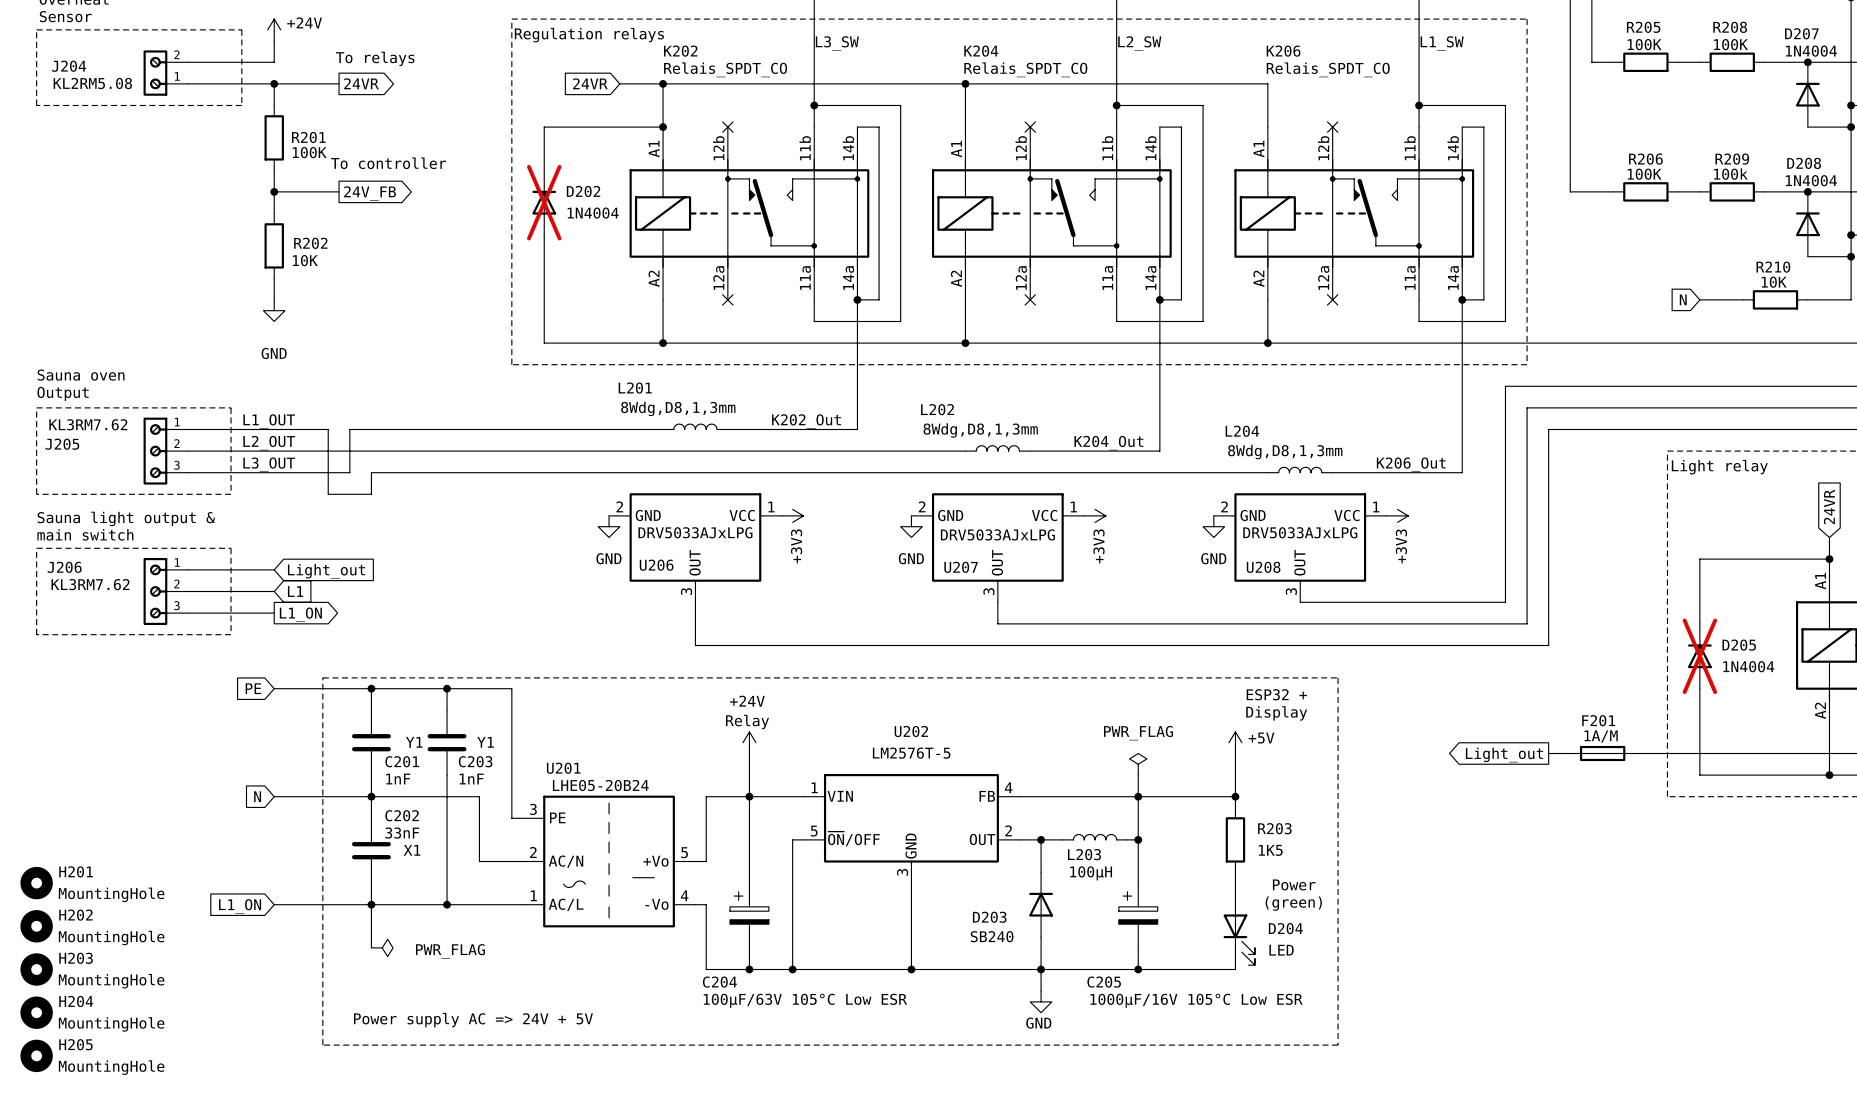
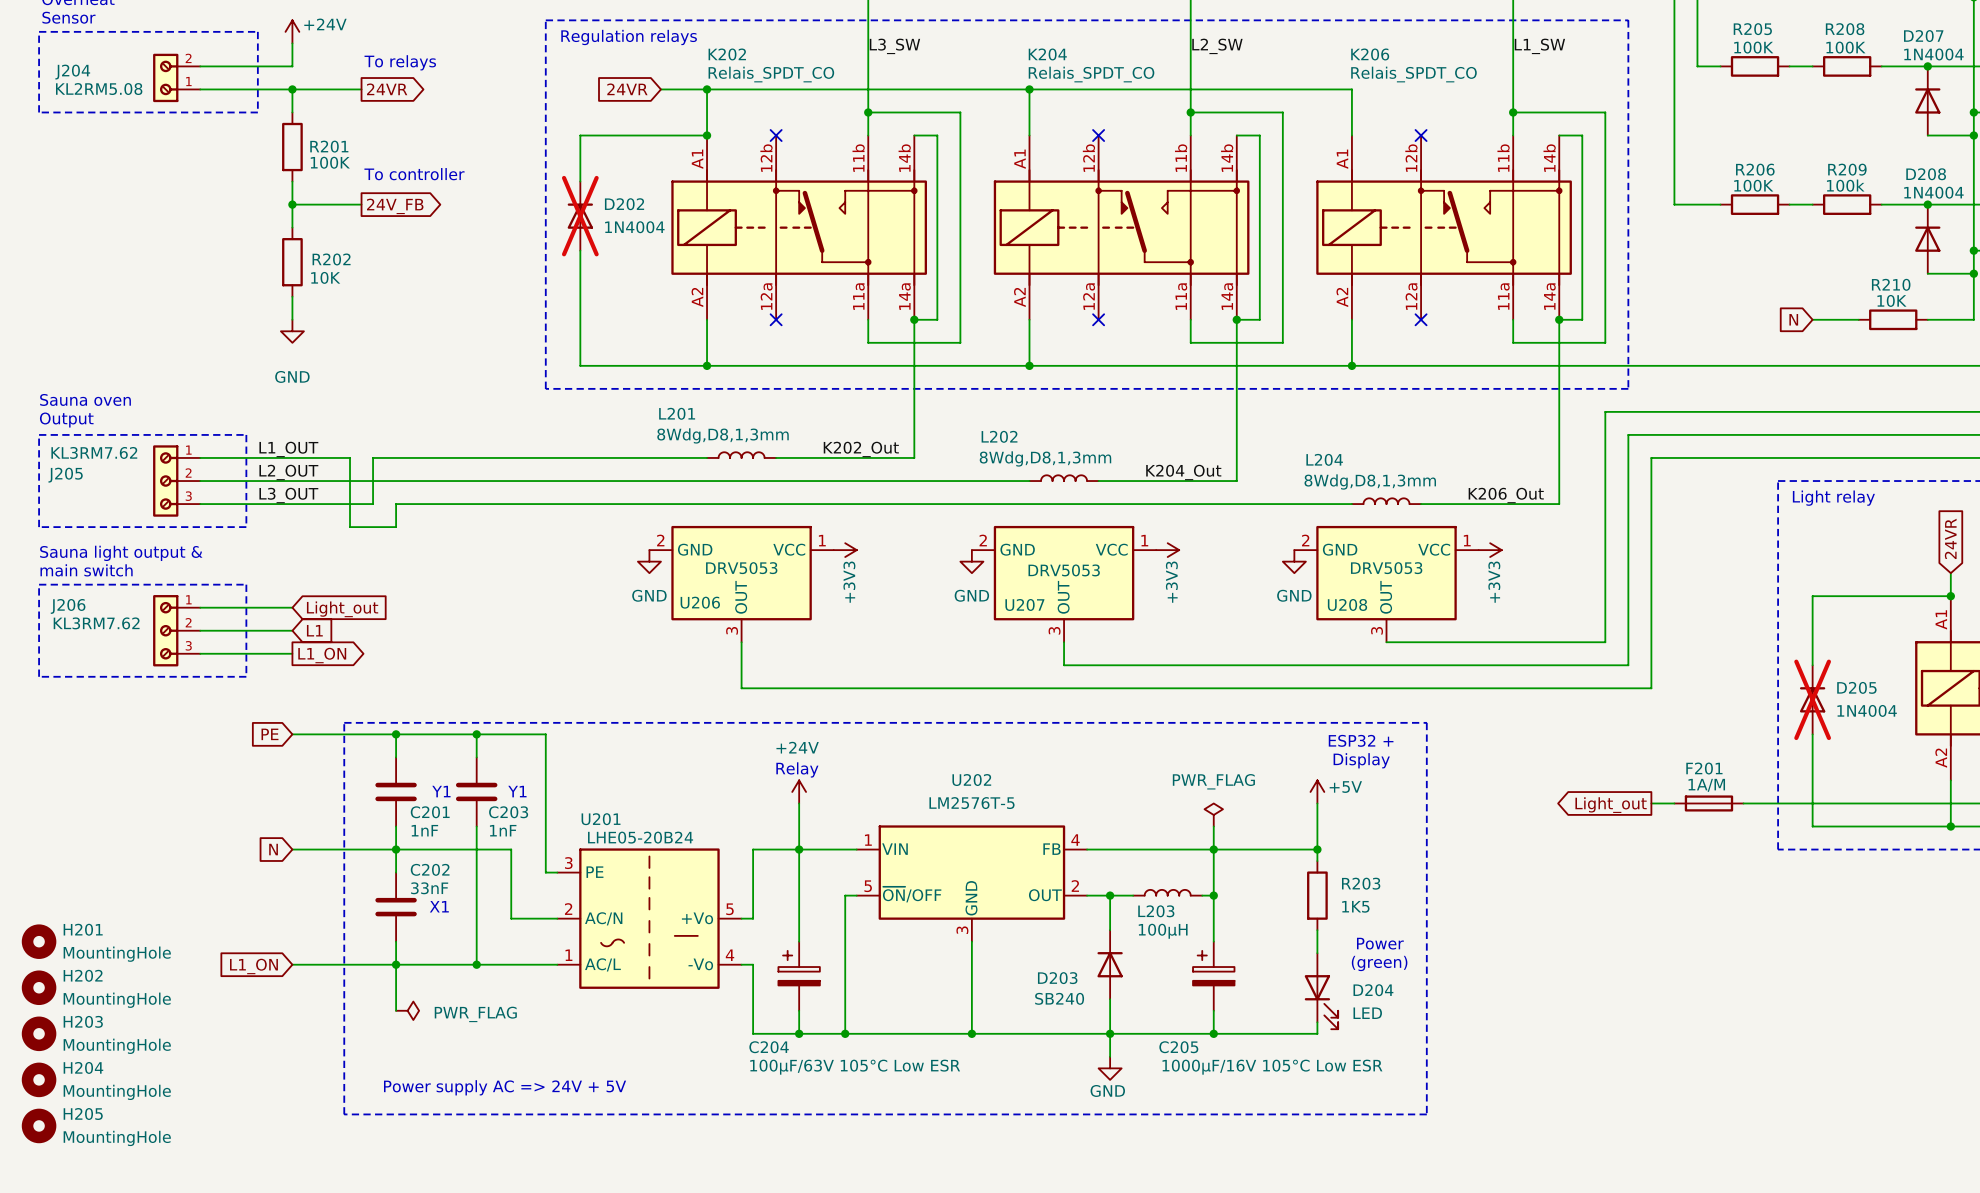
U206 value: DRV5033AJxLPG (695, 532) -> DRV5053 (741, 568)
U208 value: DRV5033AJxLPG (1300, 532) -> DRV5053 (1386, 568)
U207 value: DRV5033AJxLPG (997, 534) -> DRV5053 (1064, 570)

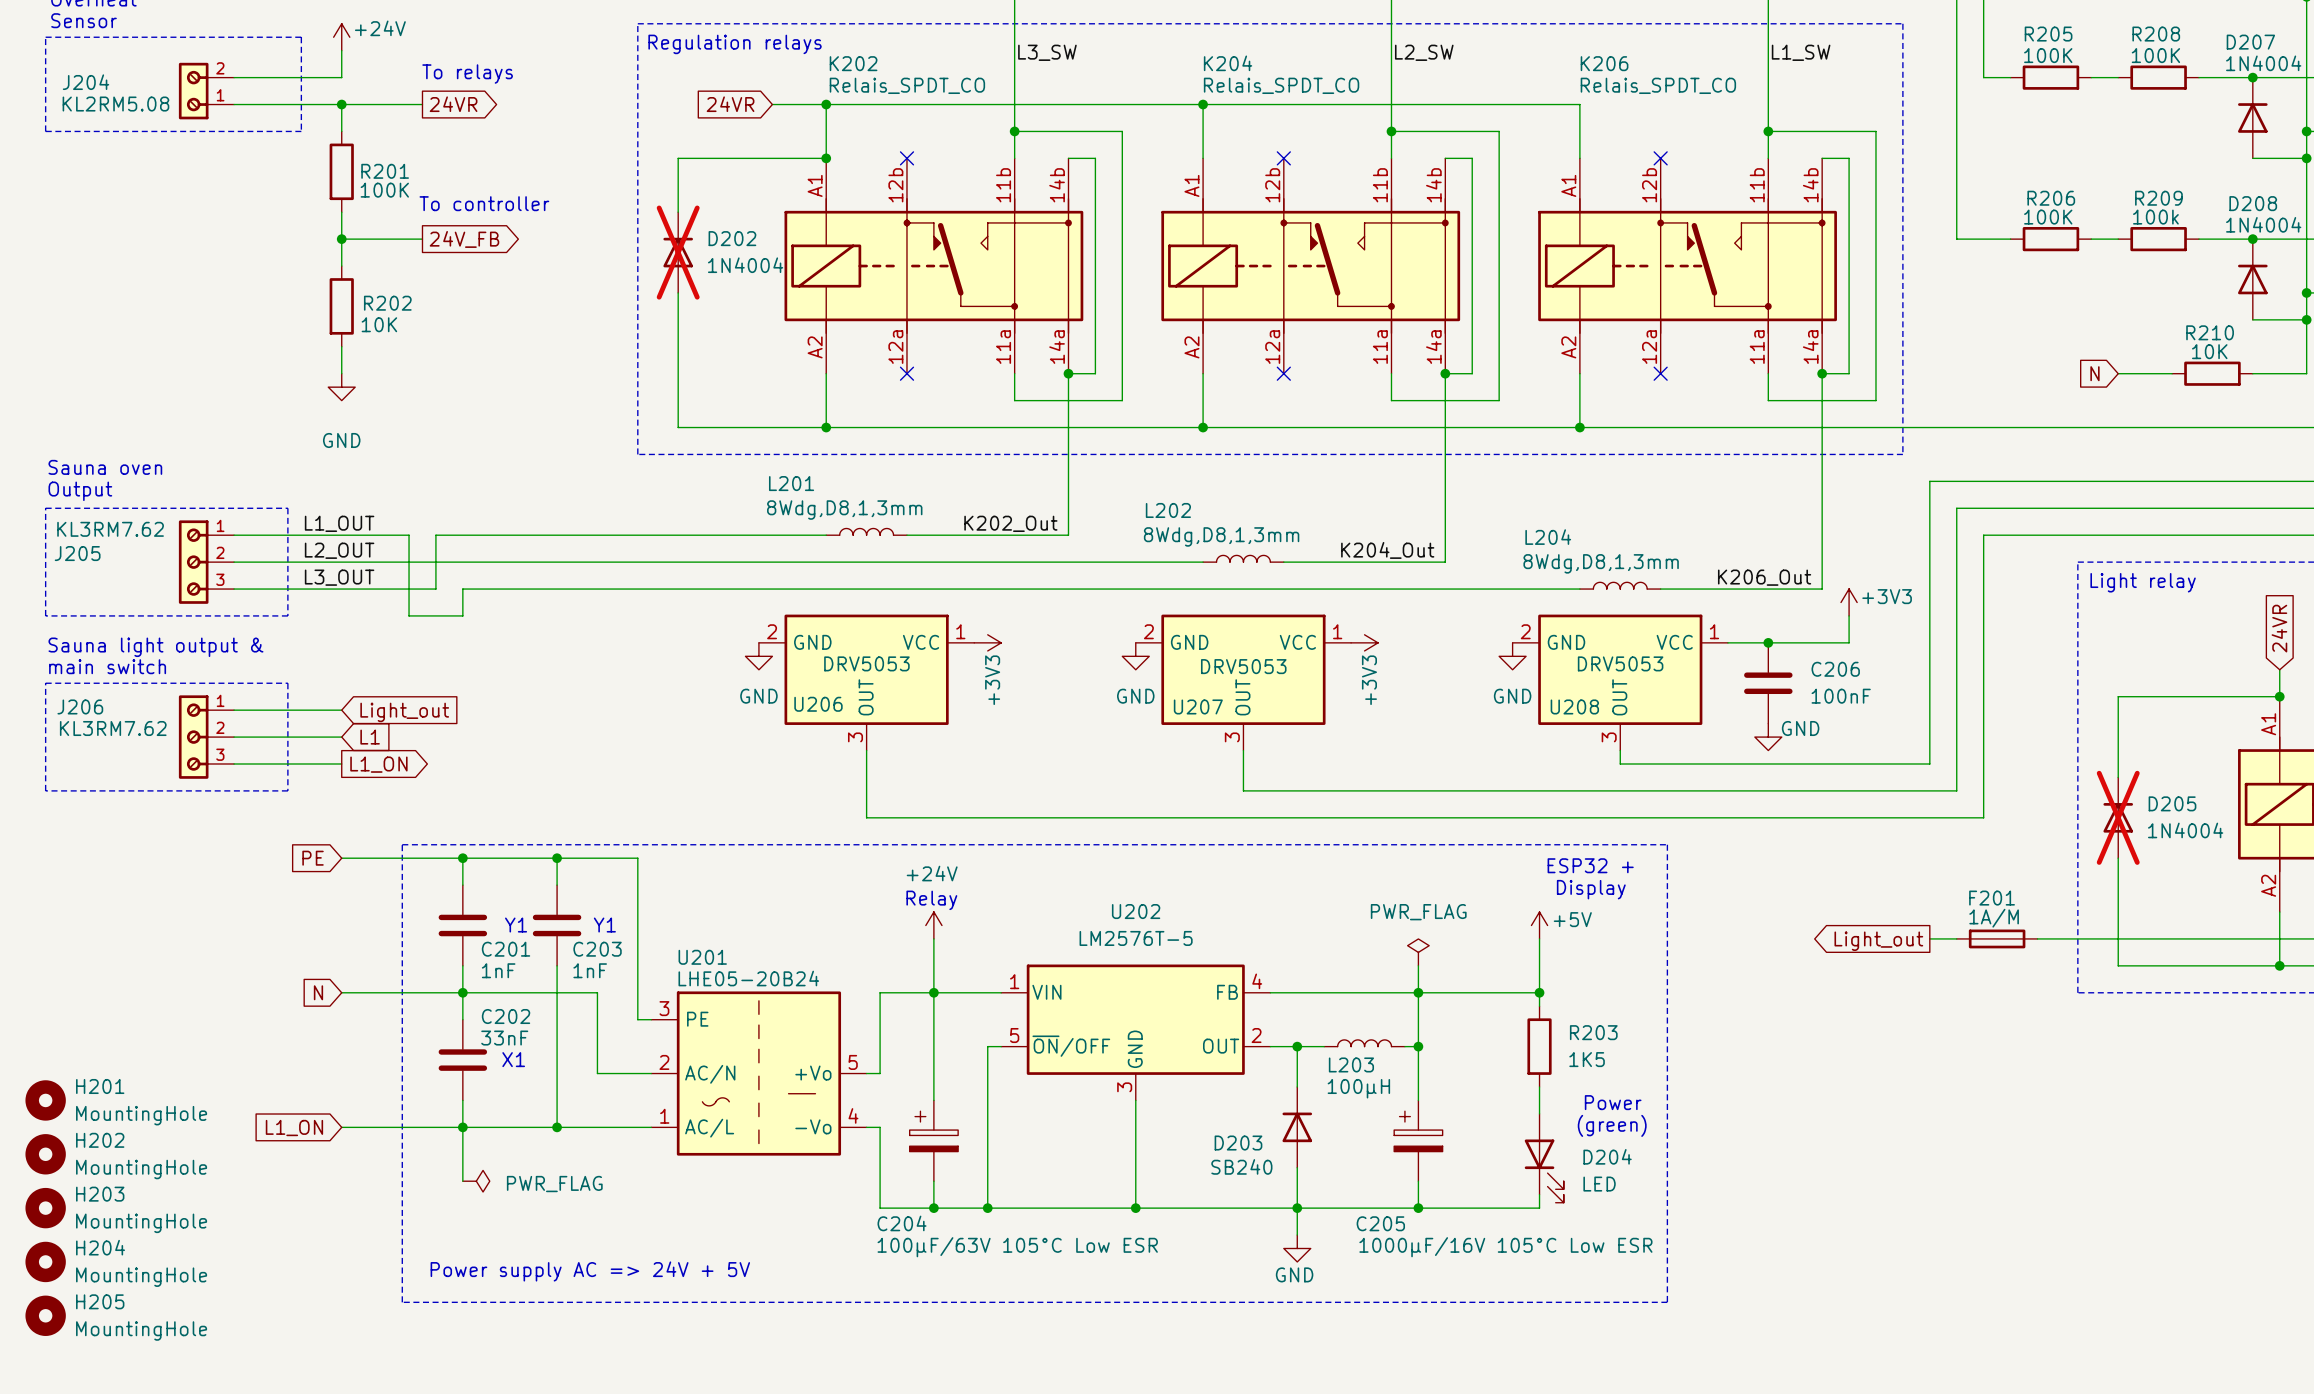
wire: (1651, 411) (1605, 411) (1605, 642) (1386, 642) -> (1929, 763) (1620, 763) (1620, 750)
wire: (1674, 434) (1628, 434) (1628, 665) (1064, 665) -> (1956, 508) (1956, 790) (1243, 790) (1243, 777)
wire: (1651, 457) (1697, 457) -> (1929, 535) (1929, 481)
wire: none -> (1849, 615) (1849, 642) (1727, 642)
power symbol rotation: 0° (1490, 550) -> 90° counterclockwise (1849, 602)
power symbol position: +3V3 (1490, 550) -> +3V3 (1849, 602)
junction: none -> (1768, 642)
C206: none -> 100nF (1768, 683)
power symbol: none -> GND (1768, 737)
wire: (1651, 653) (1651, 688) (741, 688) -> (1983, 535) (1983, 817) (866, 817) (866, 804)

